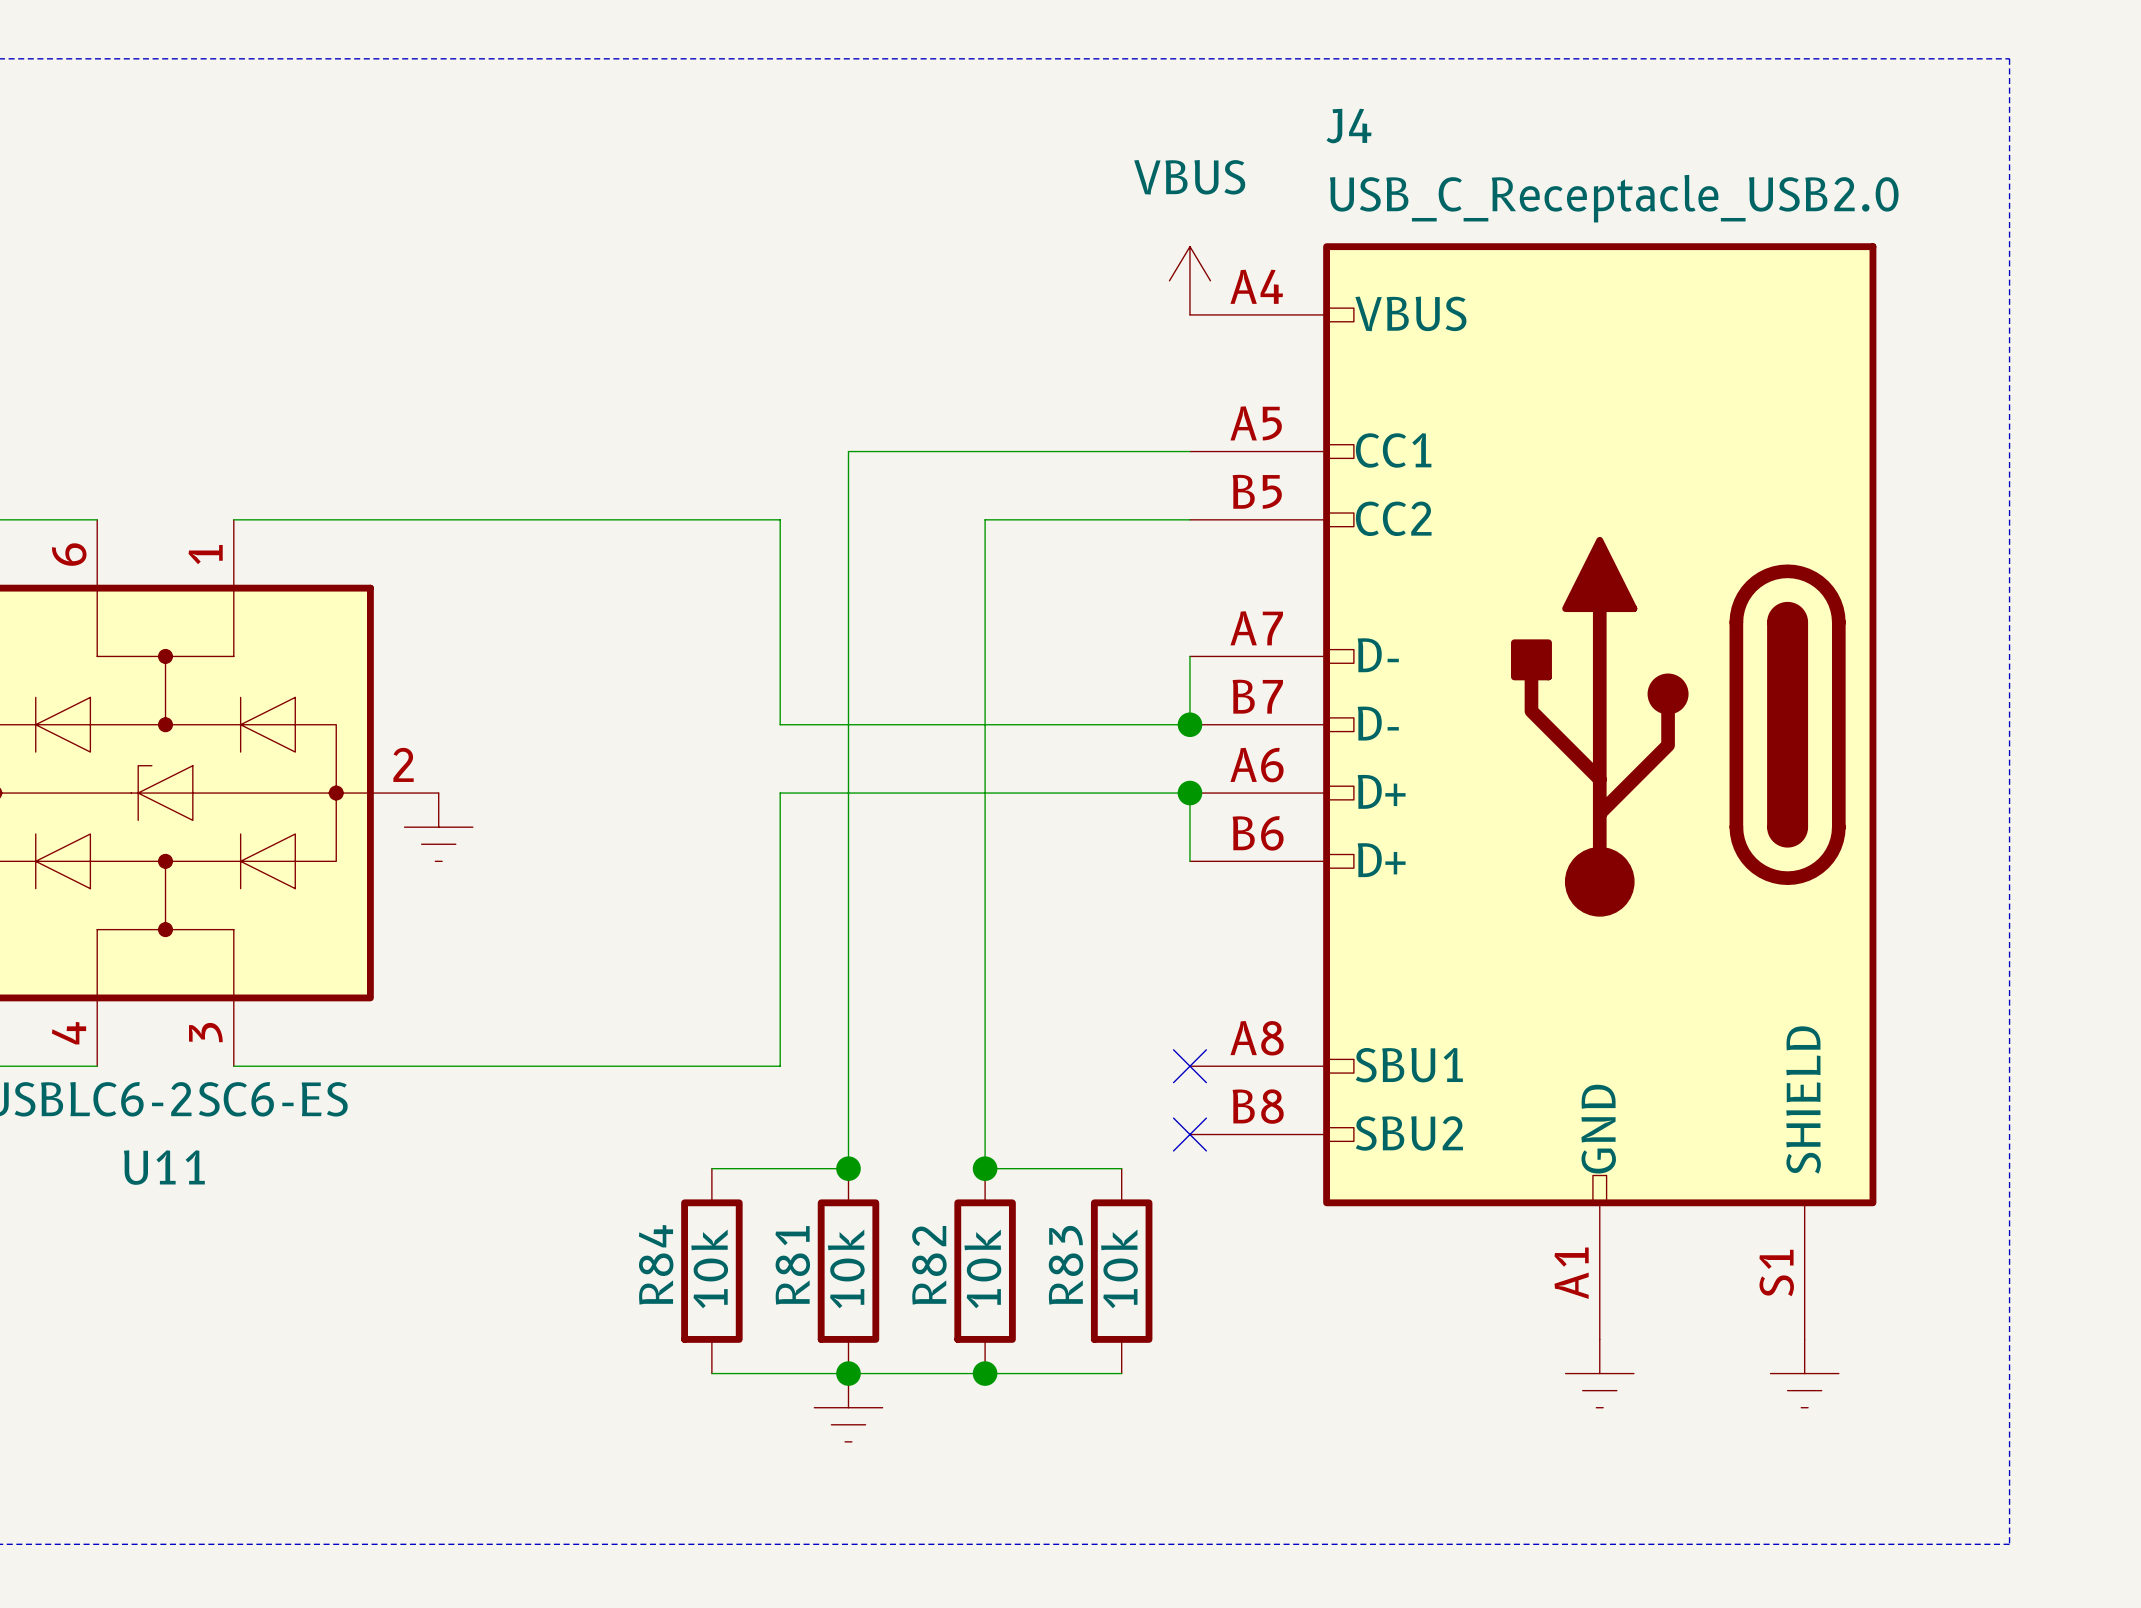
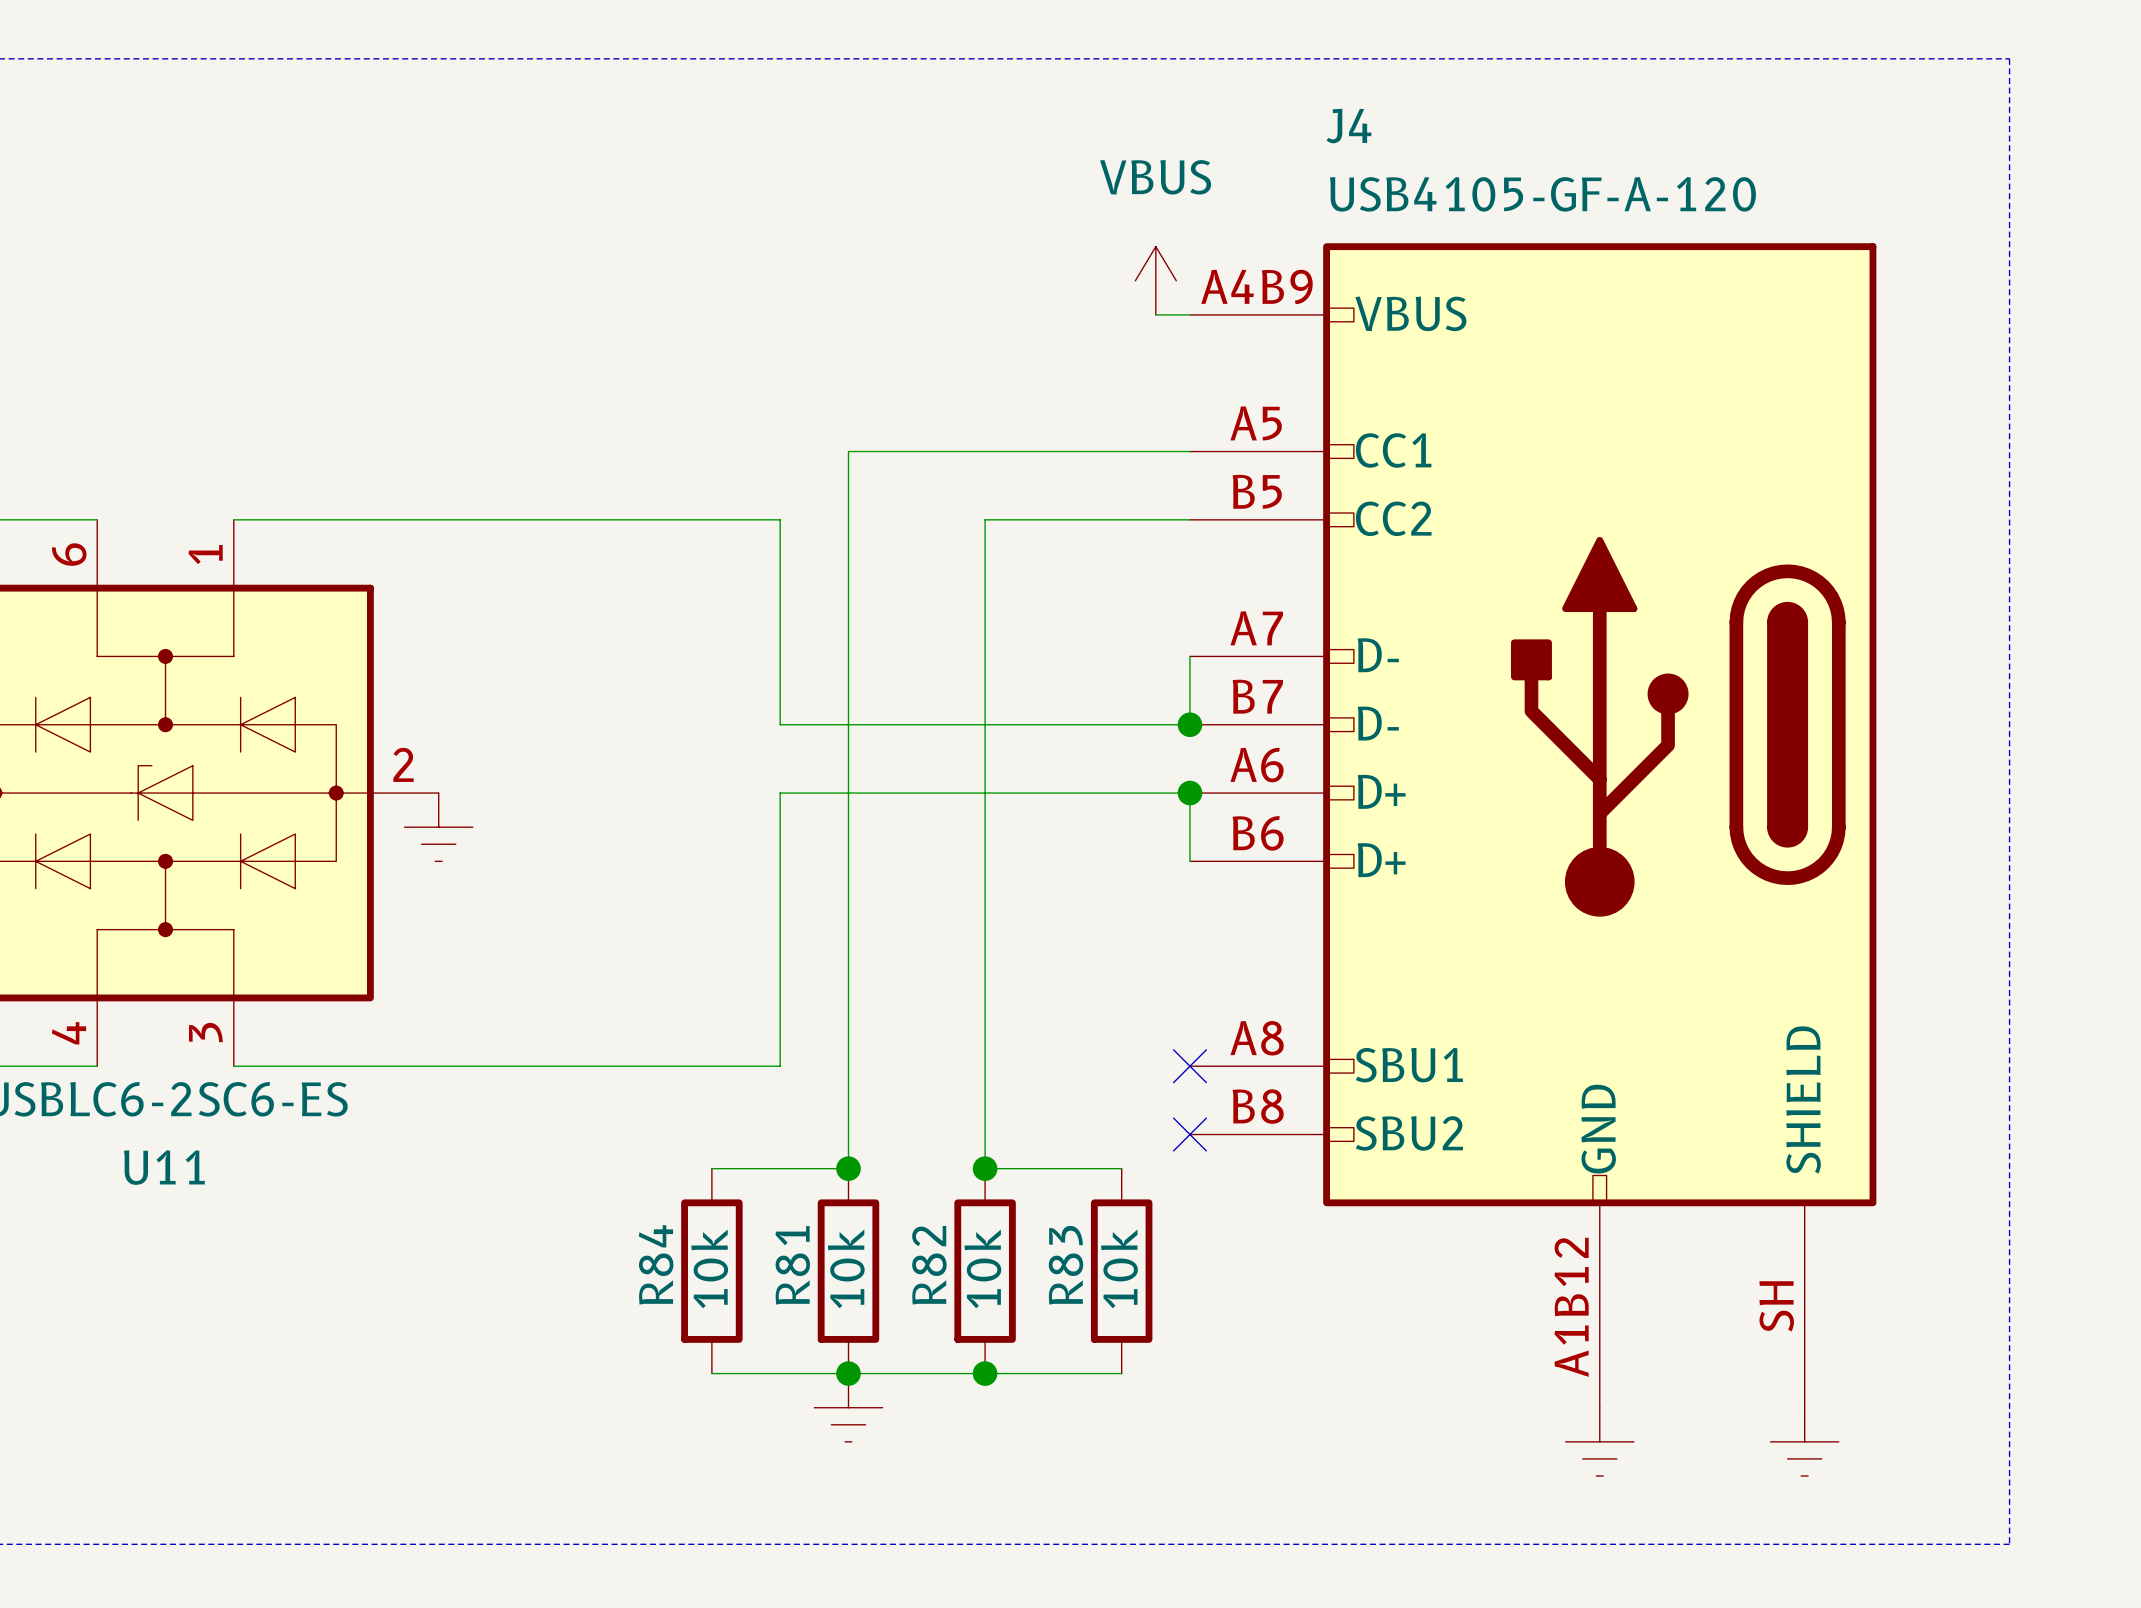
J4 value: USB_C_Receptacle_USB2.0 (1614, 198) -> USB4105-GF-A-120 (1542, 194)
J4 symbol: [1189, 243, 1877, 1340] -> [1189, 243, 1877, 1408]
power symbol position: VBUS (1189, 280) -> VBUS (1155, 280)
wire: none -> (1155, 314) (1189, 314)
power symbol position: (1599, 1373) -> (1599, 1441)
power symbol position: (1804, 1373) -> (1804, 1441)

